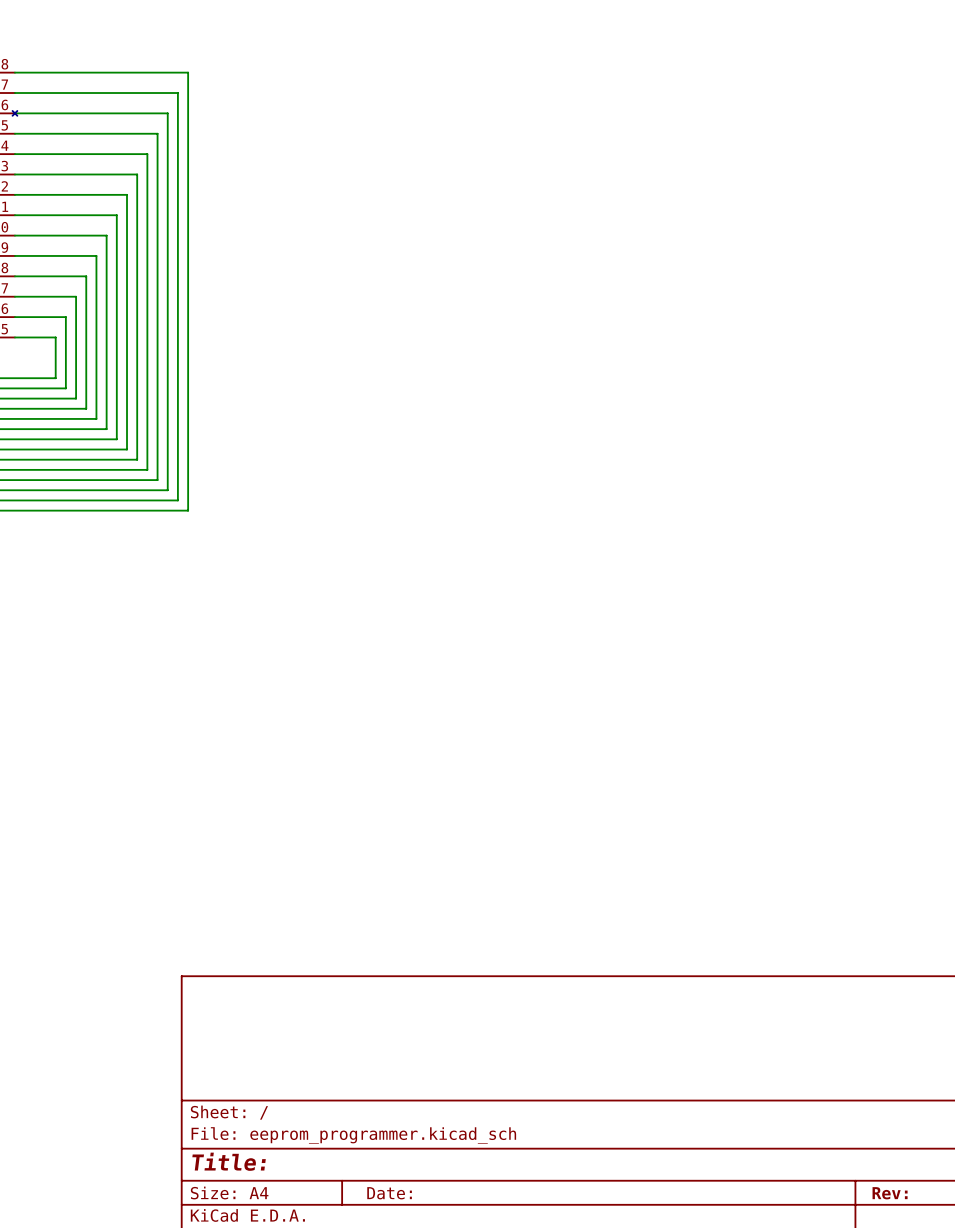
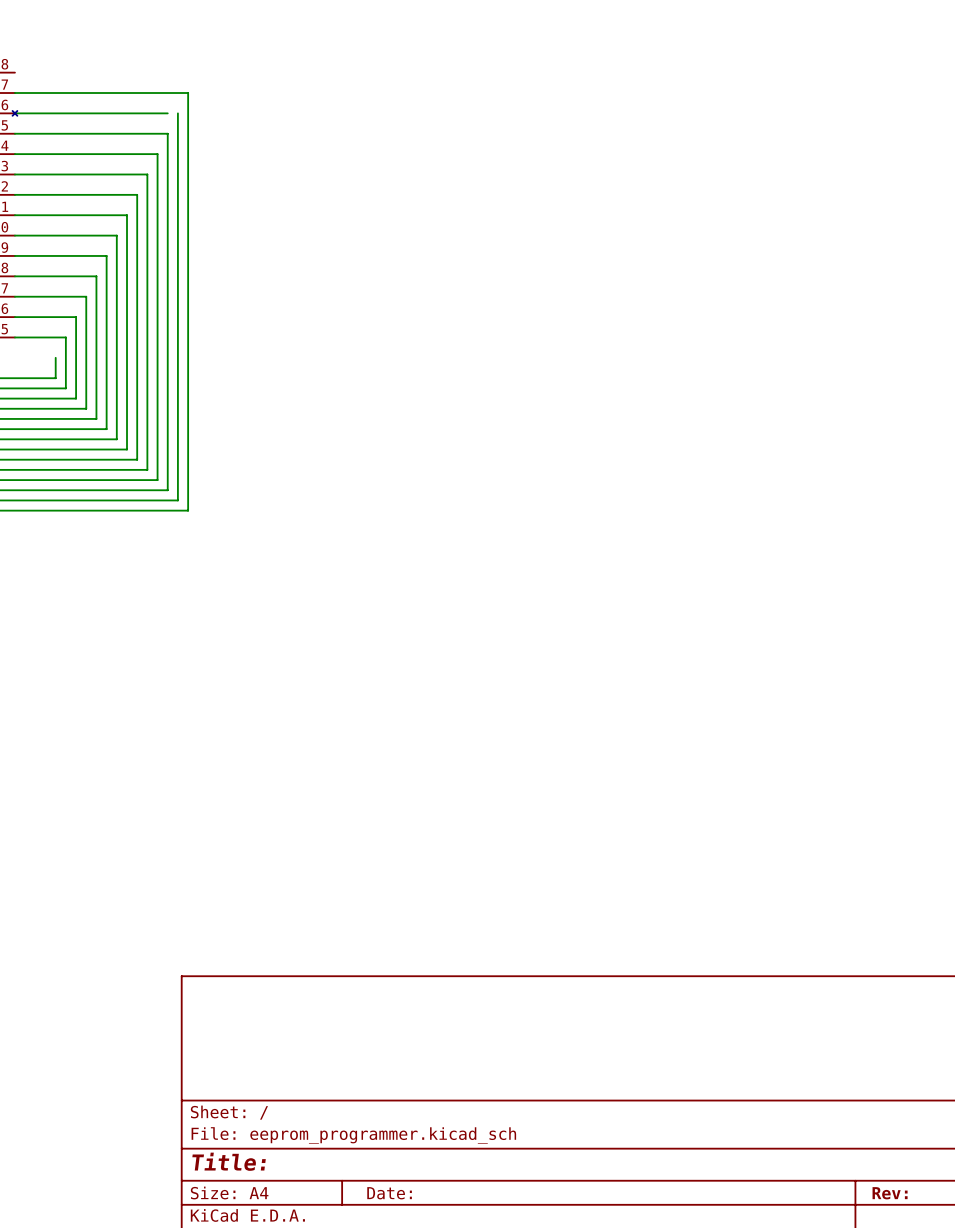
wire: (14, 72) (188, 72) (188, 93) -> none
wire: (177, 93) (177, 113) -> (177, 93) (188, 93)
wire: (167, 113) (167, 133) -> (157, 133) (167, 133)
wire: (157, 133) (157, 154) -> (147, 154) (157, 154)
wire: (147, 154) (147, 174) -> (137, 174) (147, 174)
wire: (137, 174) (137, 194) -> (127, 194) (137, 194)
wire: (127, 194) (127, 215) -> none
wire: (116, 215) (116, 235) -> (116, 215) (127, 215)
wire: (106, 235) (106, 255) -> (106, 235) (116, 235)
wire: (96, 255) (96, 276) -> (96, 255) (106, 255)
wire: (86, 276) (86, 296) -> (86, 276) (96, 276)
wire: (76, 296) (76, 317) -> (76, 296) (86, 296)
wire: (65, 317) (65, 337) -> (65, 317) (76, 317)
wire: (55, 337) (55, 357) -> (55, 337) (65, 337)

